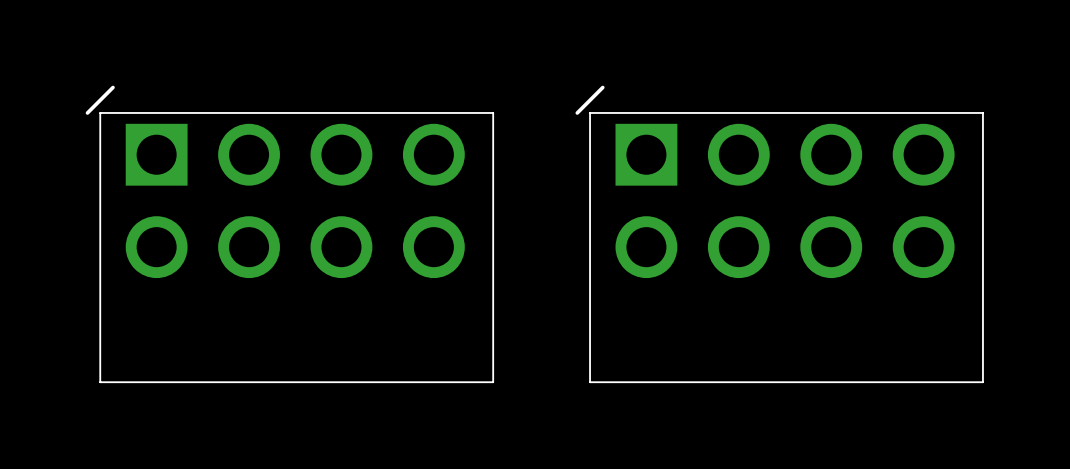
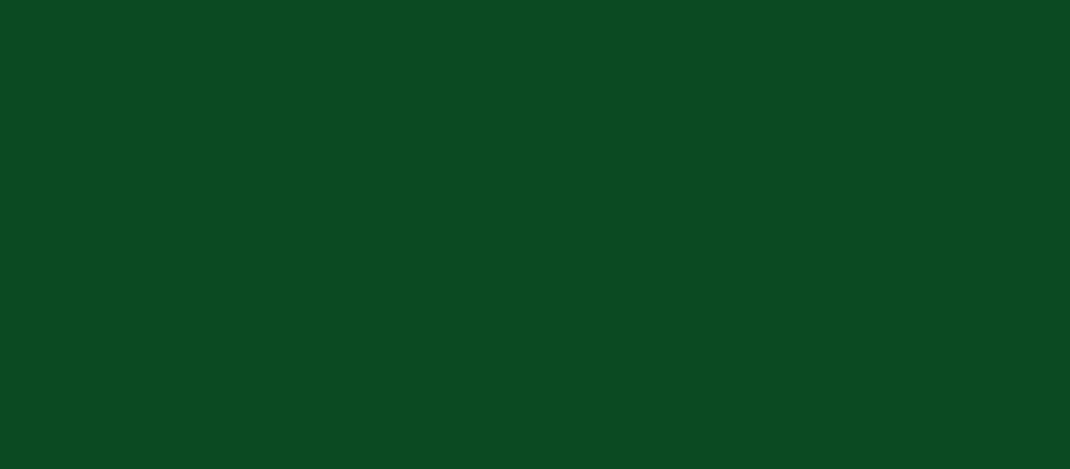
board edge: (112, 87) (87, 112) -> none
board edge: (602, 87) (577, 112) -> none
board edge: (493, 112) (100, 112) (100, 382) (493, 382) (493, 112) -> none
board edge: (982, 112) (590, 112) (590, 382) (982, 382) (982, 112) -> none
part: (295, 200) -> none
part: (785, 200) -> none

